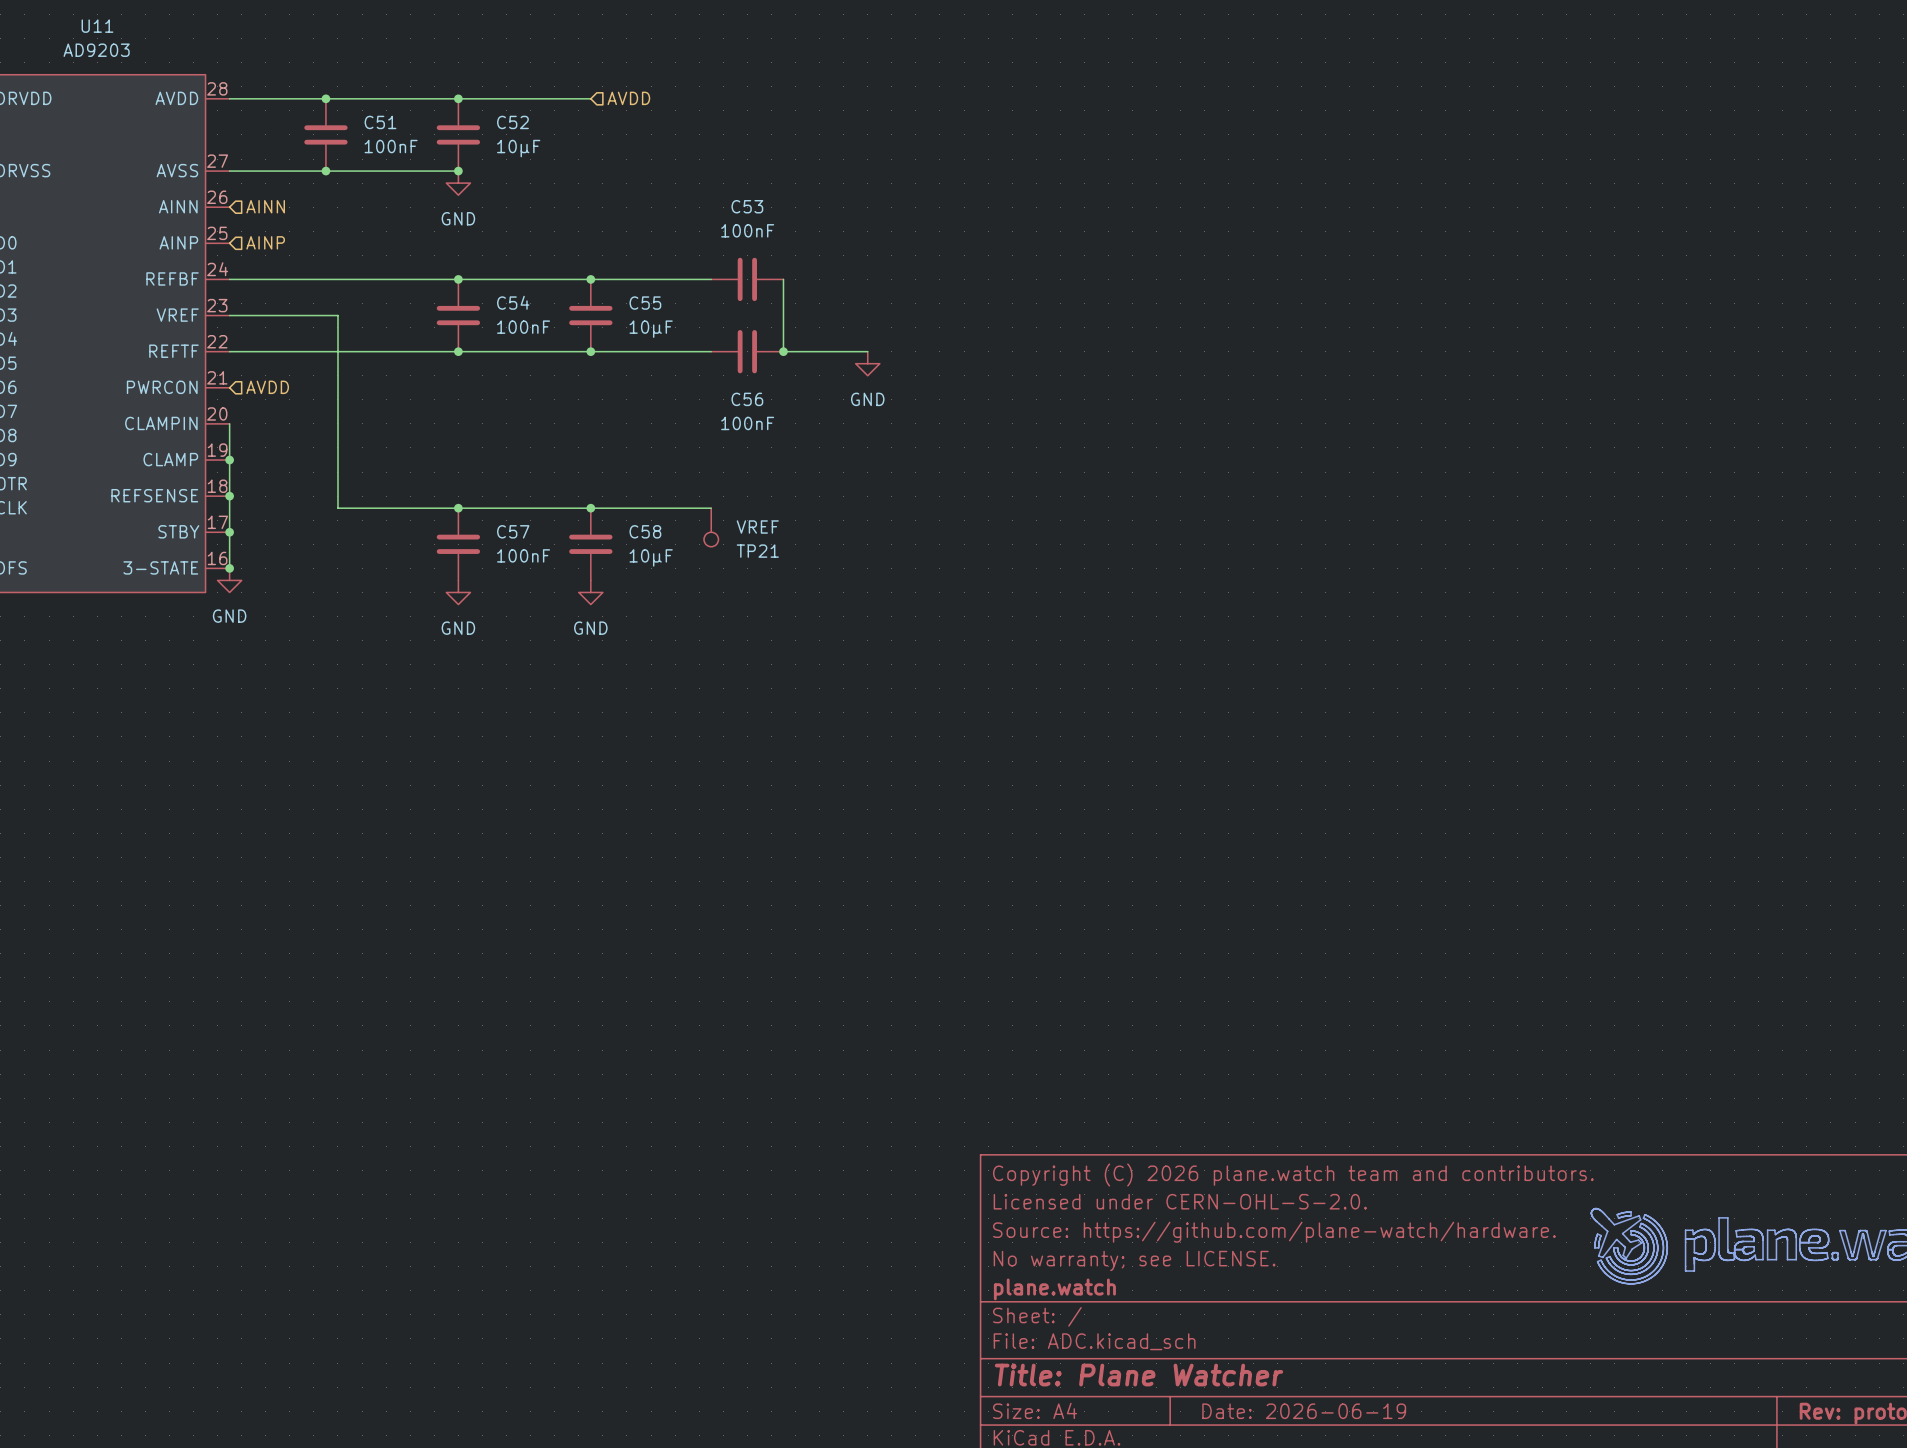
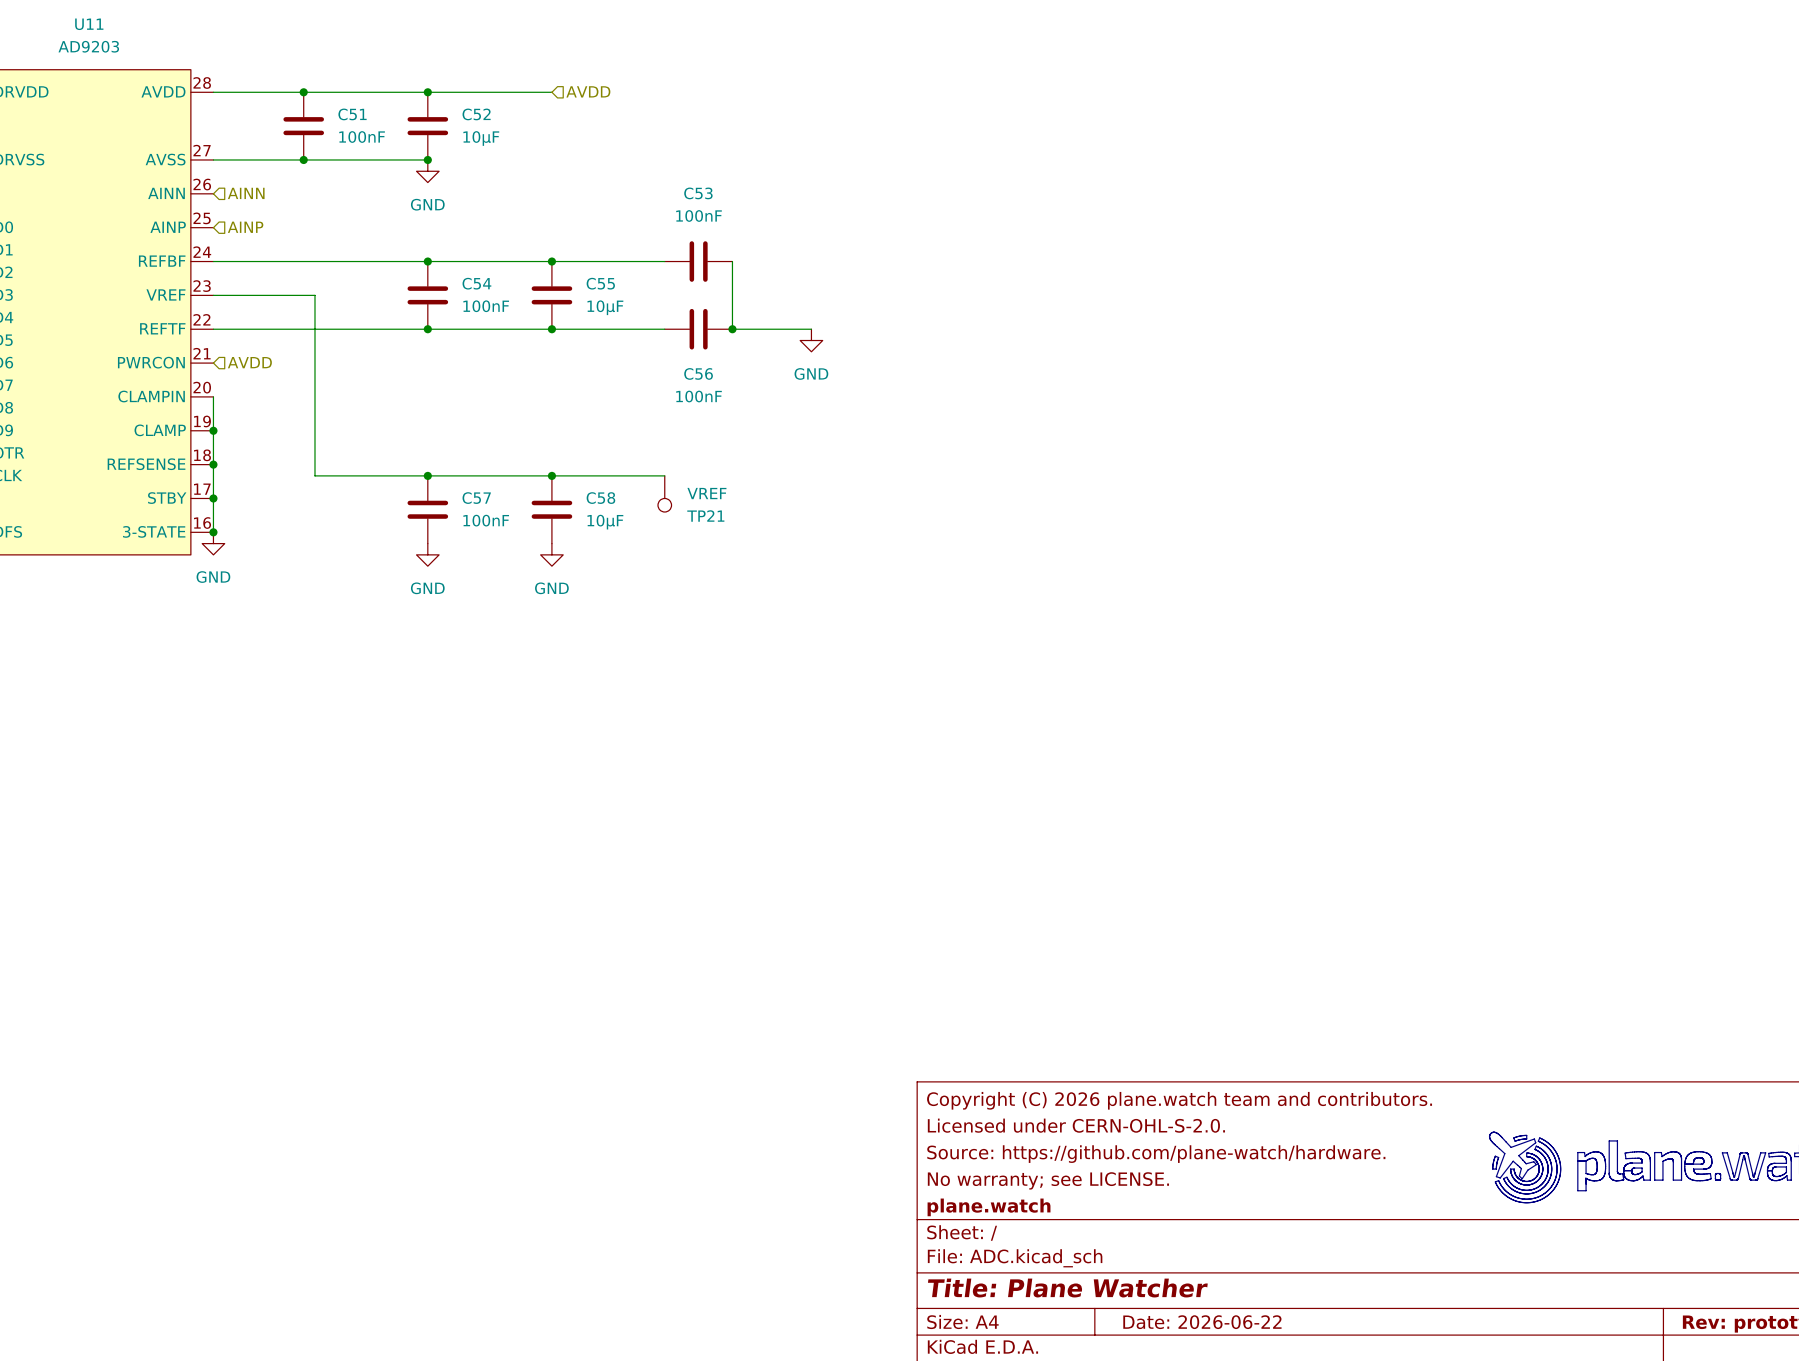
title block: Date: 2026-06-19 (1304, 1411) -> Date: 2026-06-22 (1202, 1322)

